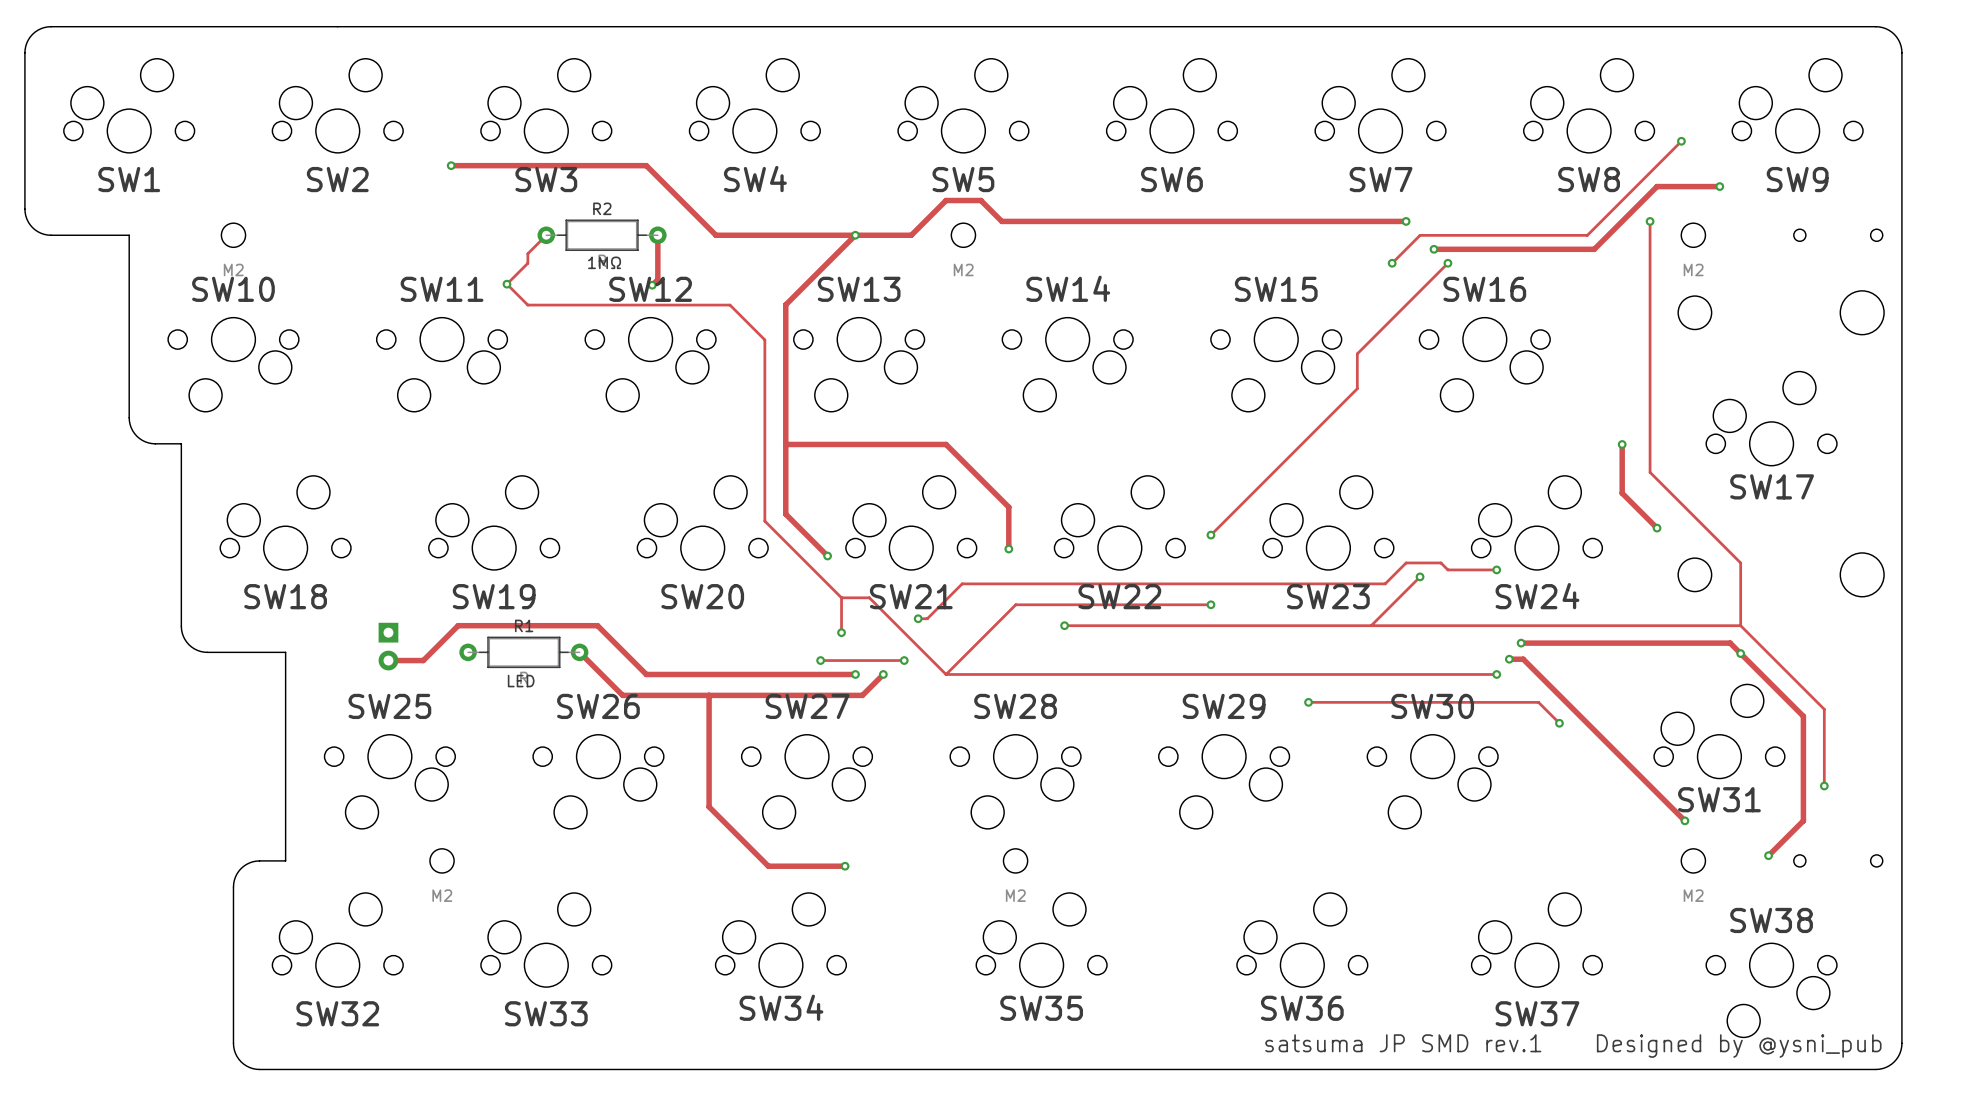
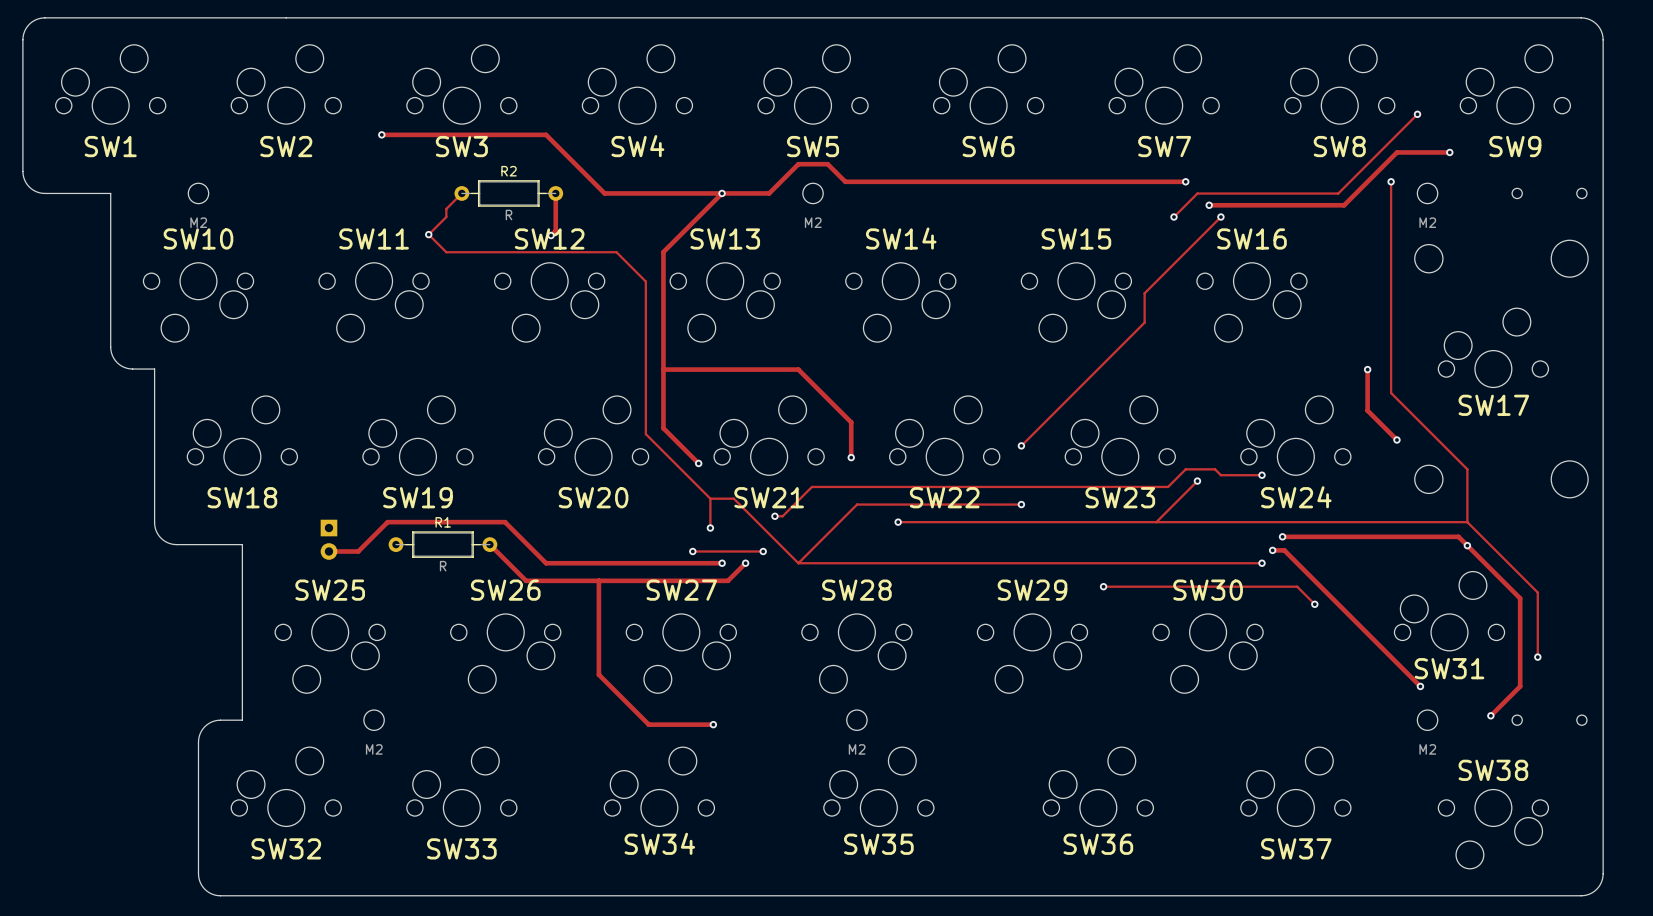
text: 1MΩ (604, 262) -> none
text: LED (521, 681) -> none
text: satsuma JP SMD rev.1 Designed by @ysni_pub (1573, 1046) -> none

